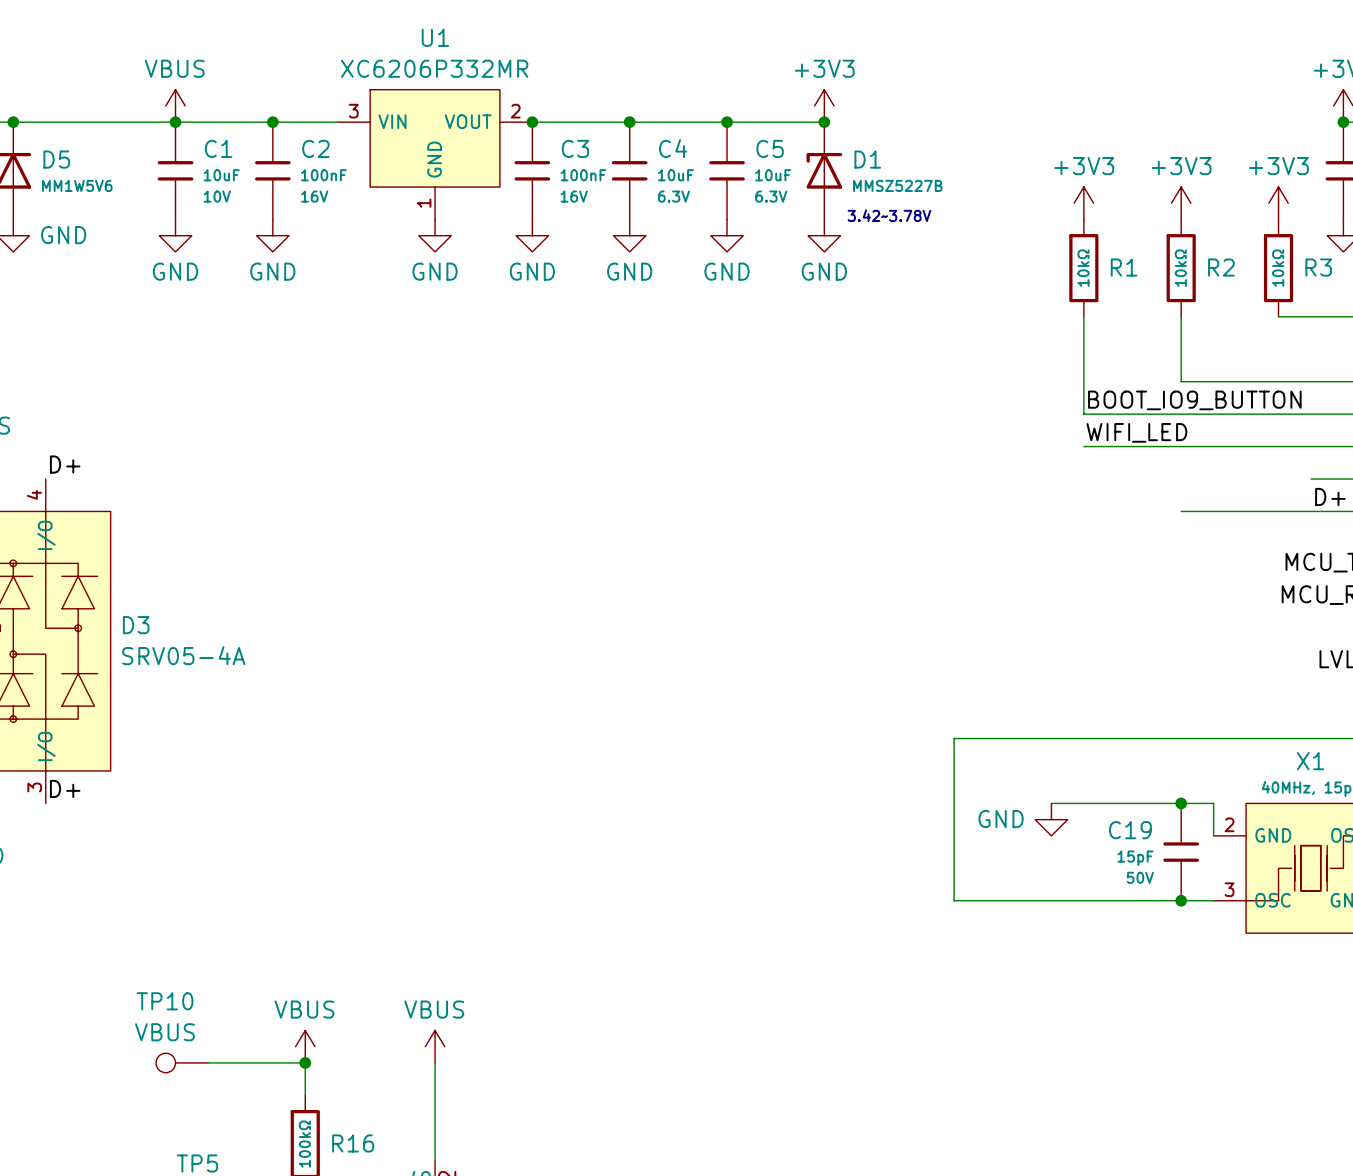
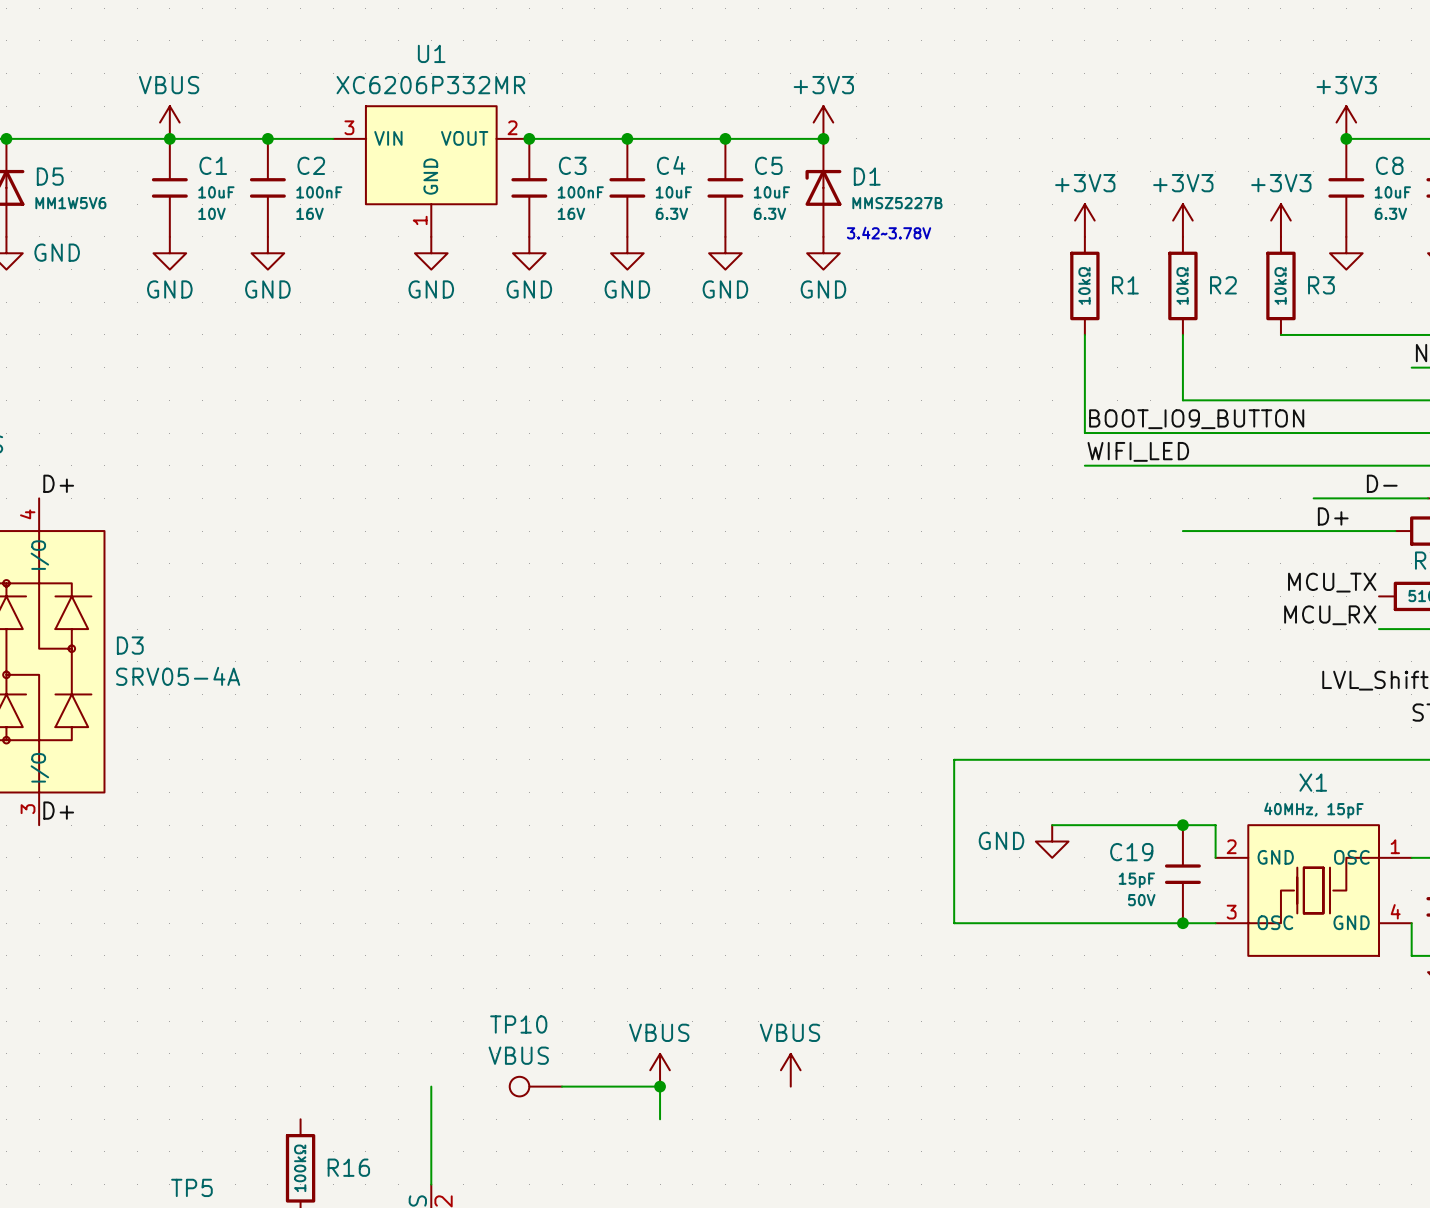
power symbol: VBUS (305, 1046) -> none
power symbol: VBUS (435, 1046) -> none
power symbol: none -> VBUS (660, 1070)
power symbol: none -> VBUS (790, 1070)
TP10 position: (182, 1062) -> (535, 1086)
wire: (207, 1062) (305, 1062) (305, 1095) -> none
junction: (305, 1062) -> none
wire: none -> (562, 1086) (660, 1086) (660, 1119)
junction: none -> (660, 1086)

